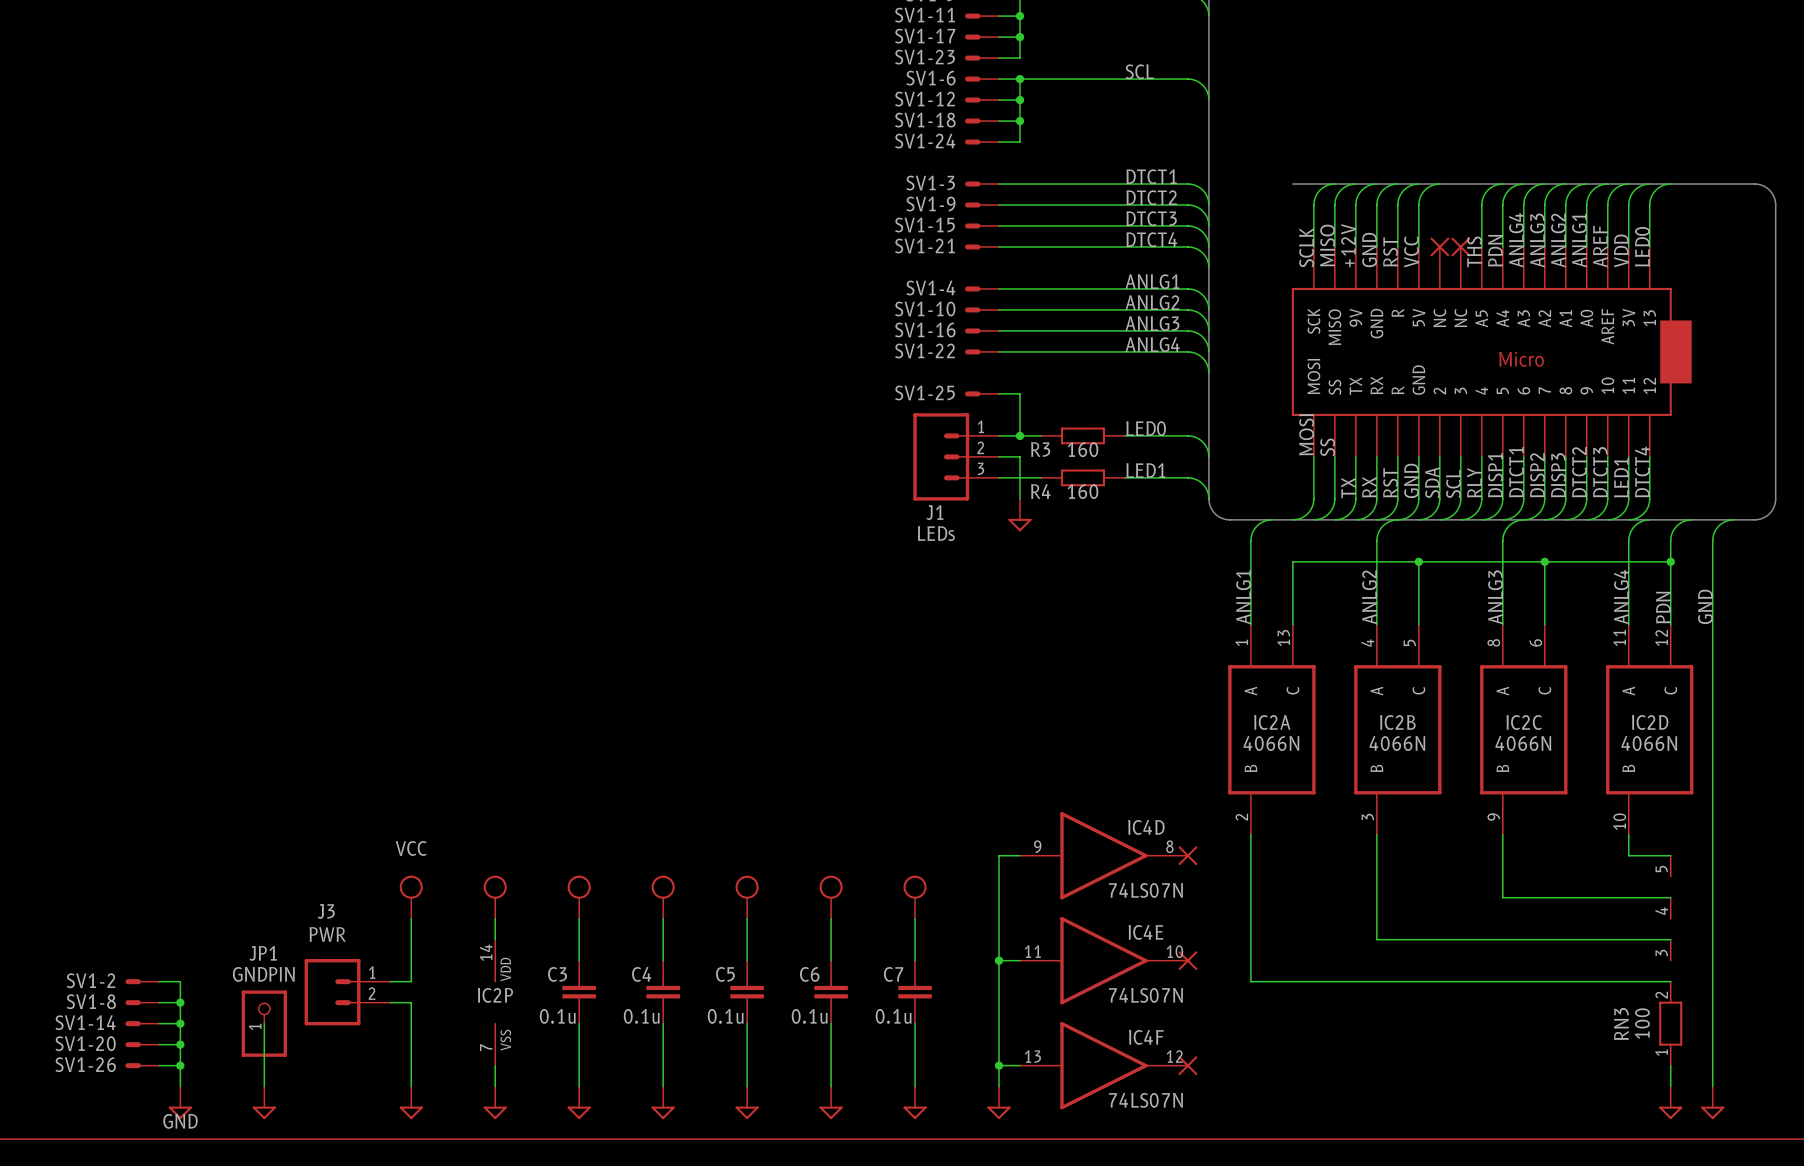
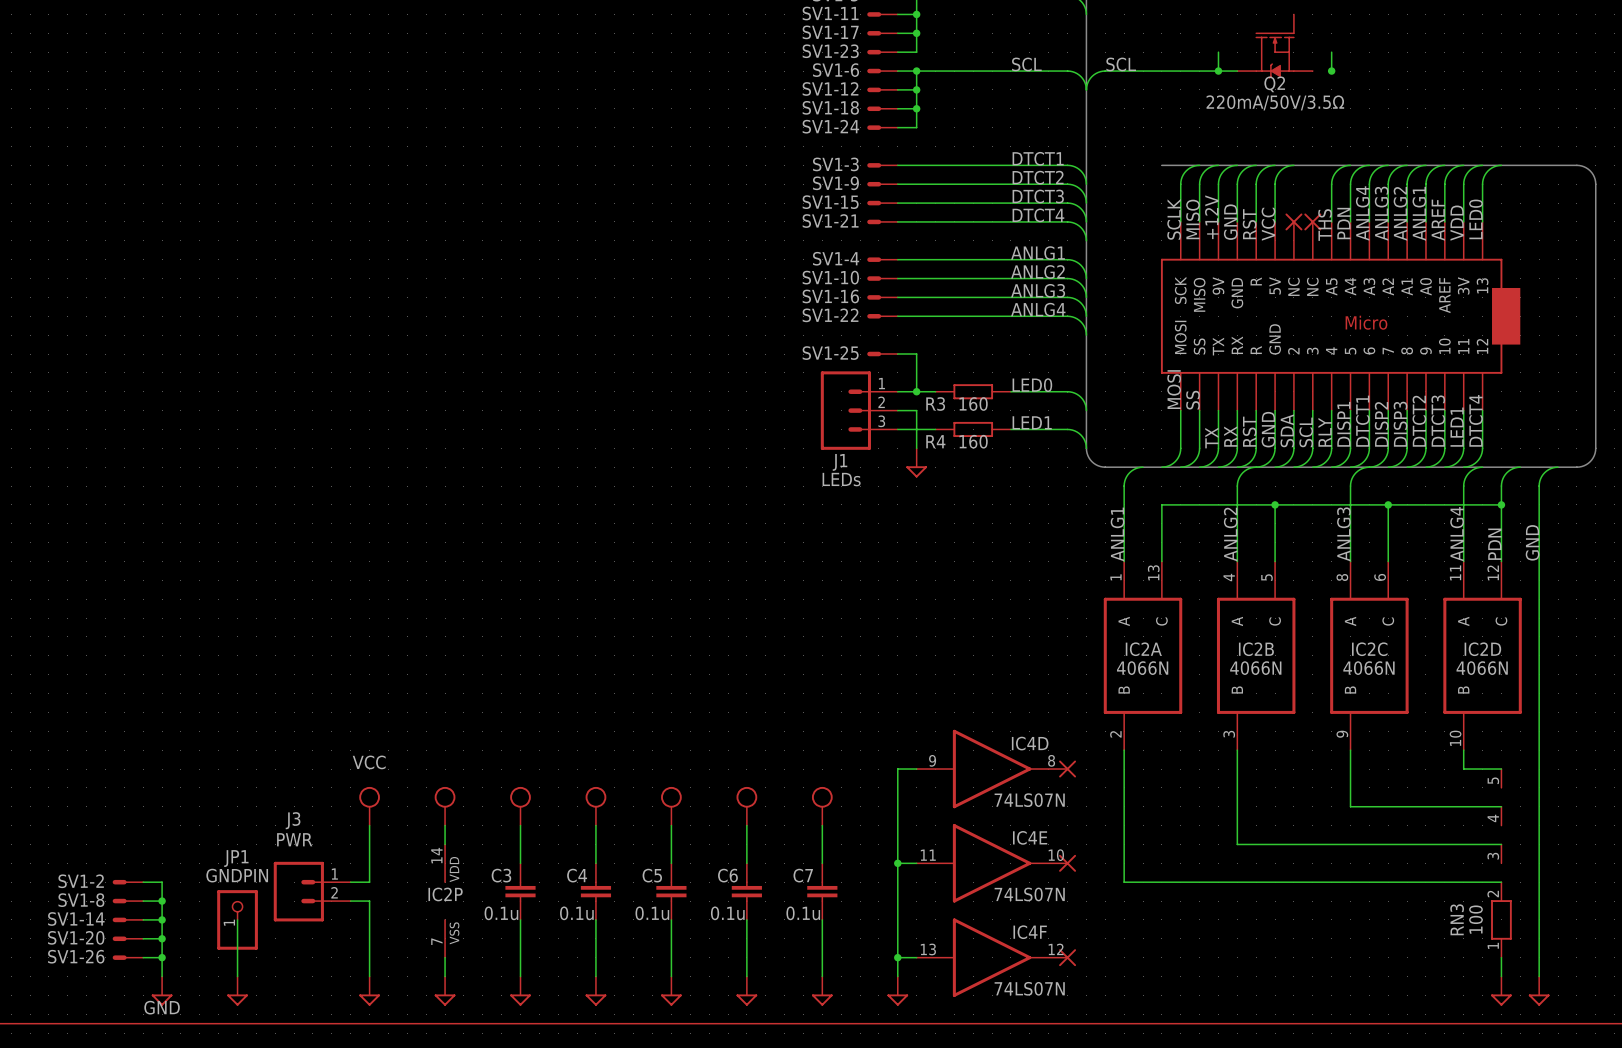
Q2: none -> 220mA/50V/3.5Ω (1275, 46)
wire: none -> (1218, 52) (1218, 71)
wire: none -> (1331, 52) (1331, 71)
label: none -> SCL (1121, 64)
junction: none -> (1218, 71)
wire: none -> (1237, 71) (1102, 71) (1090, 78) (1086, 89)
junction: none -> (1331, 71)

